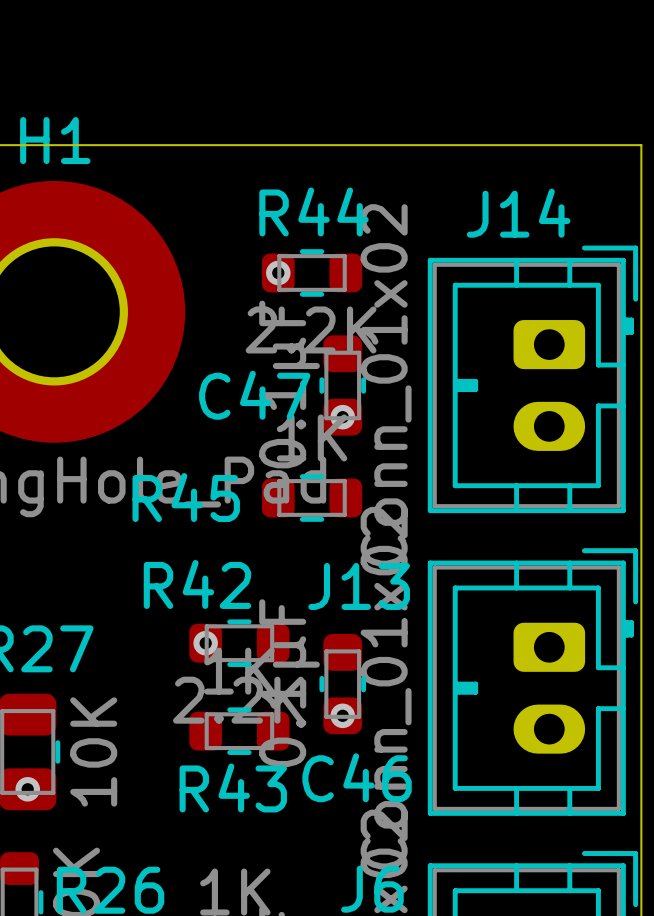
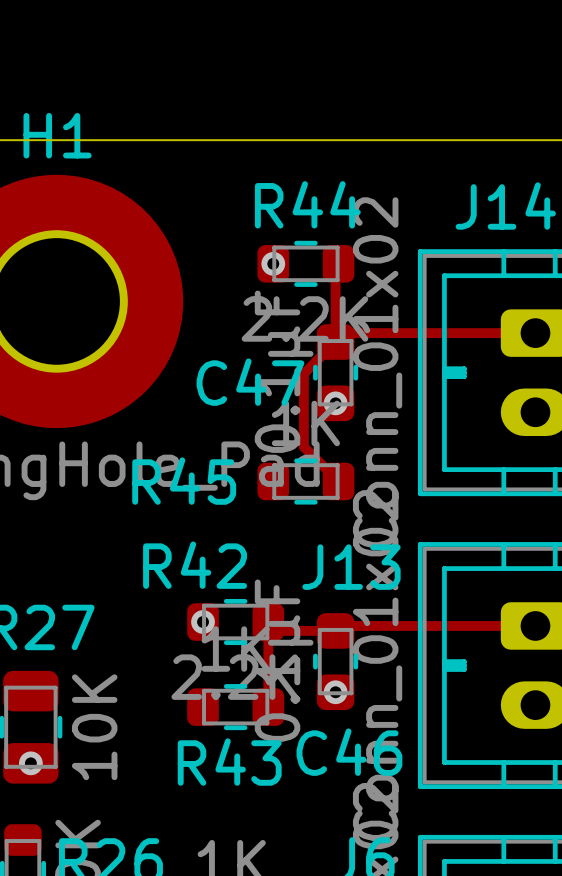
track: none -> (338, 263) (335, 266) (335, 342)
track: none -> (535, 333) (344, 333) (303, 373) (303, 446) (338, 481)
track: none -> (535, 625) (340, 625) (335, 630) (277, 630) (268, 622) (268, 707)

